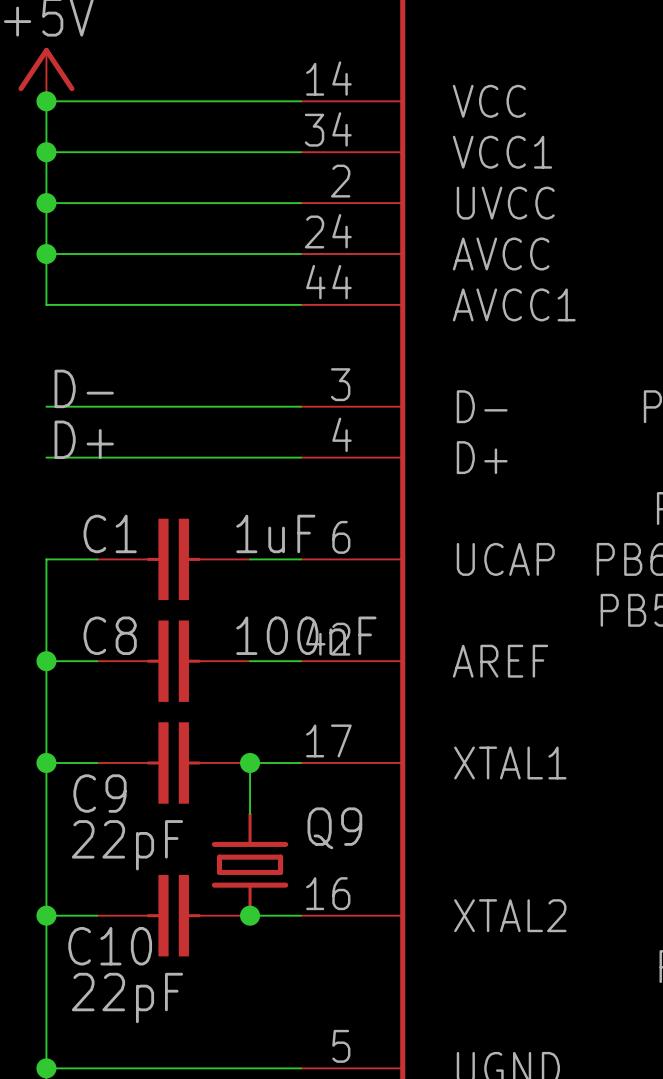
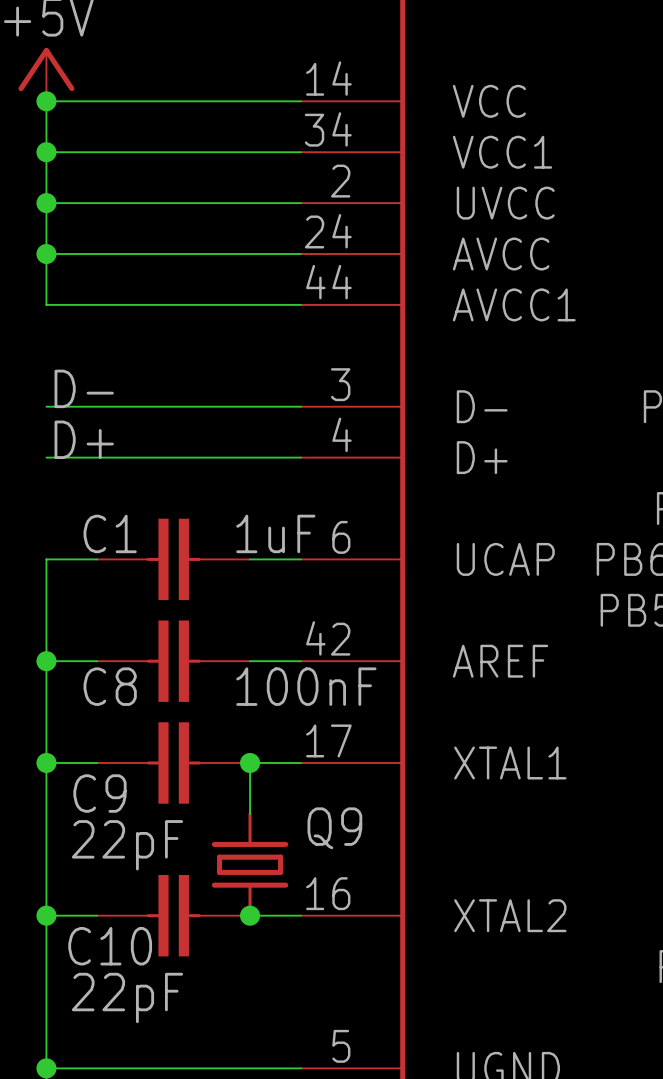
C8 name position: C8 (110, 635) -> C8 (110, 686)
C8 value position: 100nF (306, 635) -> 100nF (306, 686)

